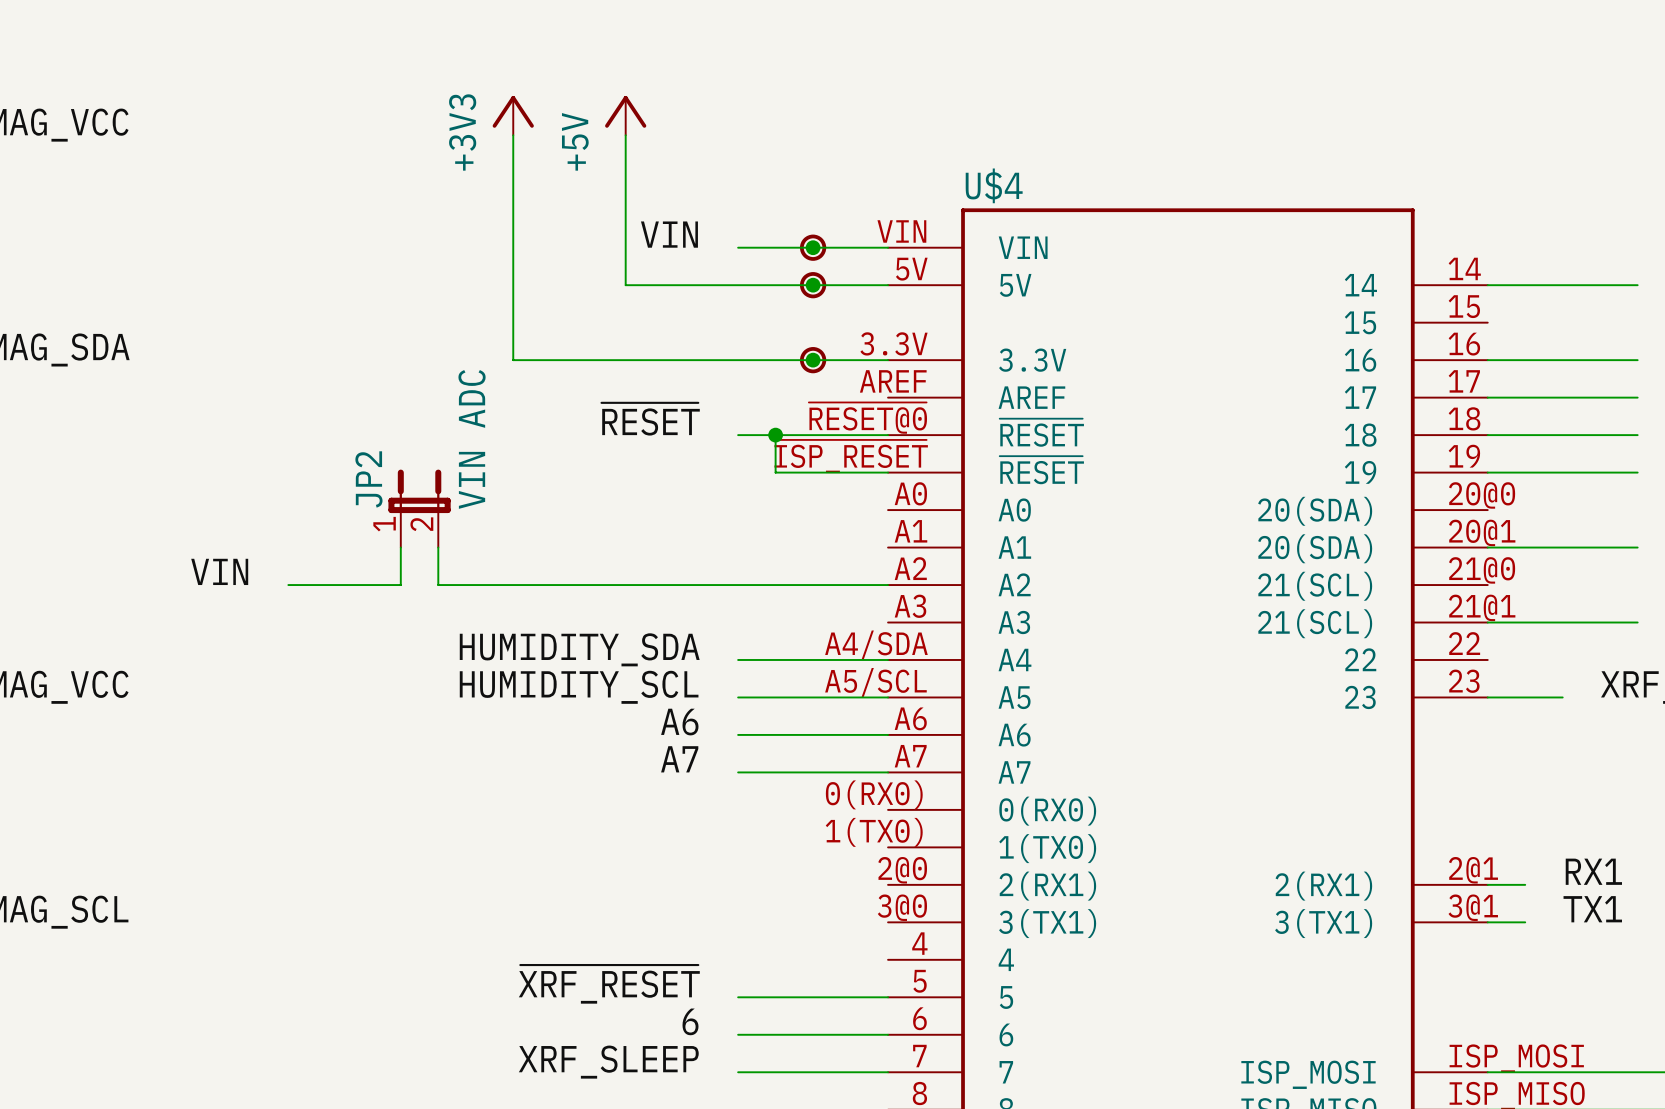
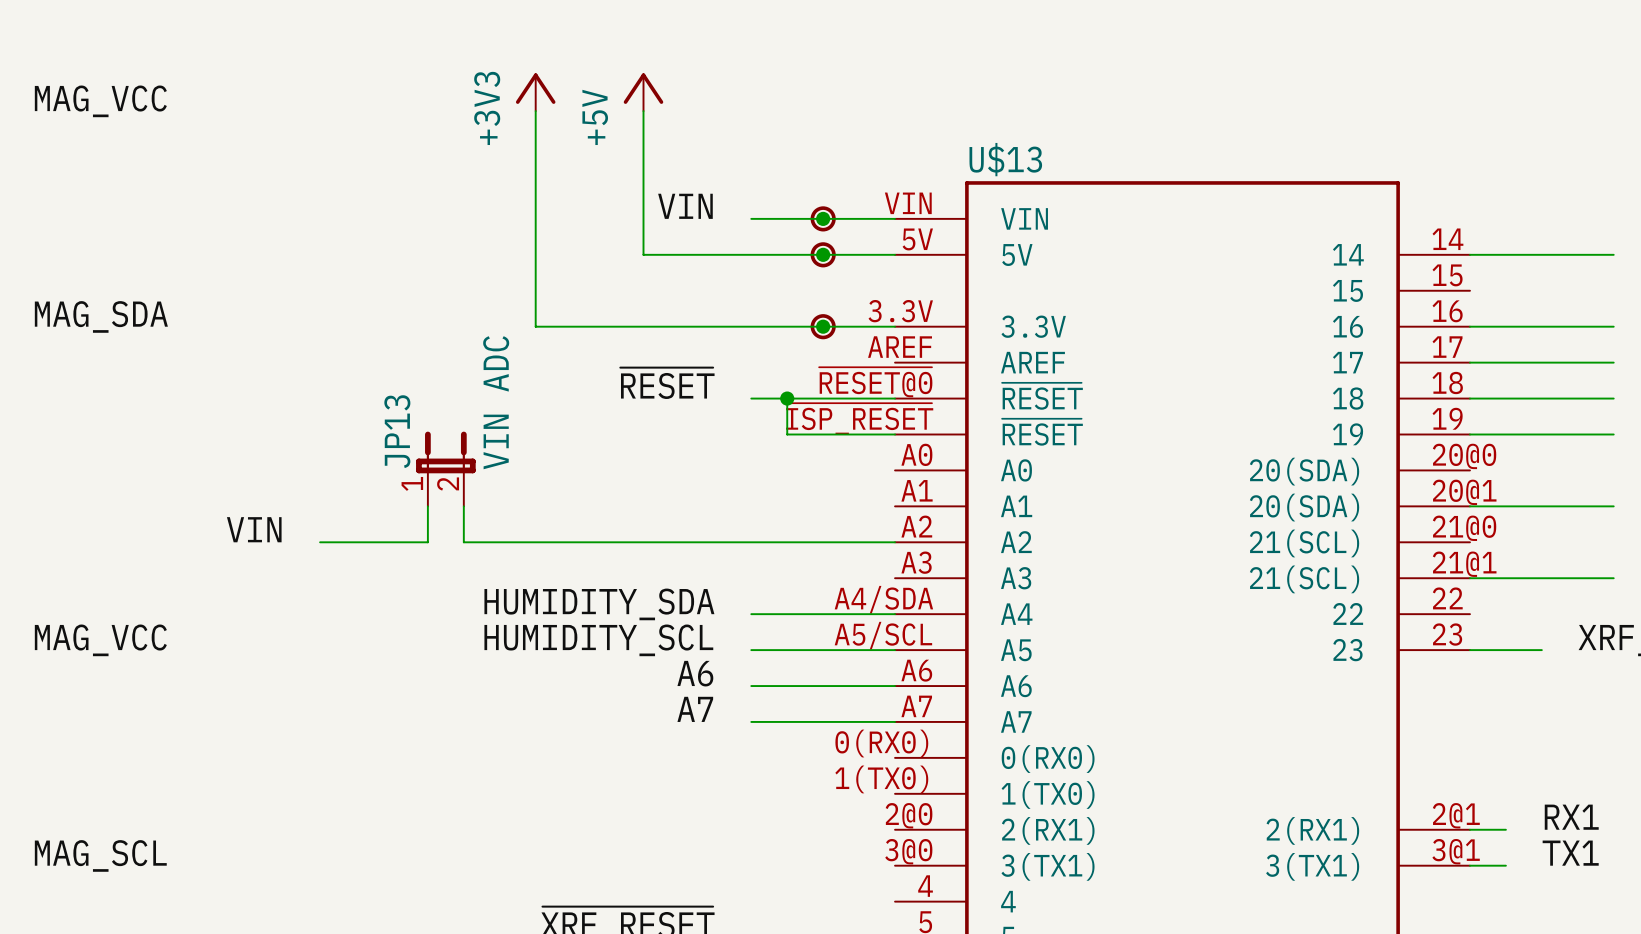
U$4 name: U$4 (994, 185) -> U$13 (1005, 159)
JP2 name: JP2 (368, 479) -> JP13 (397, 431)

